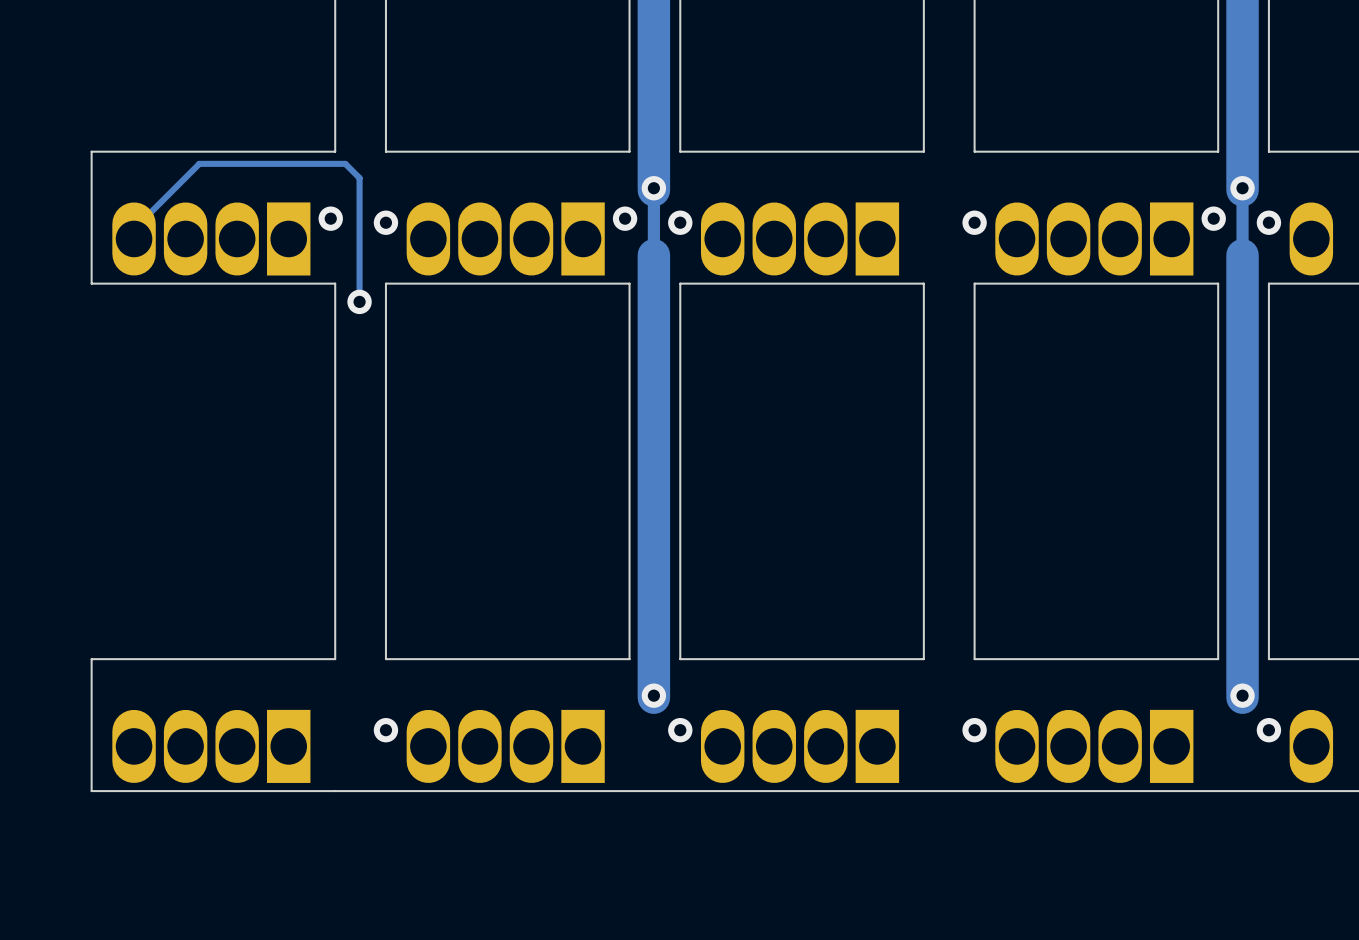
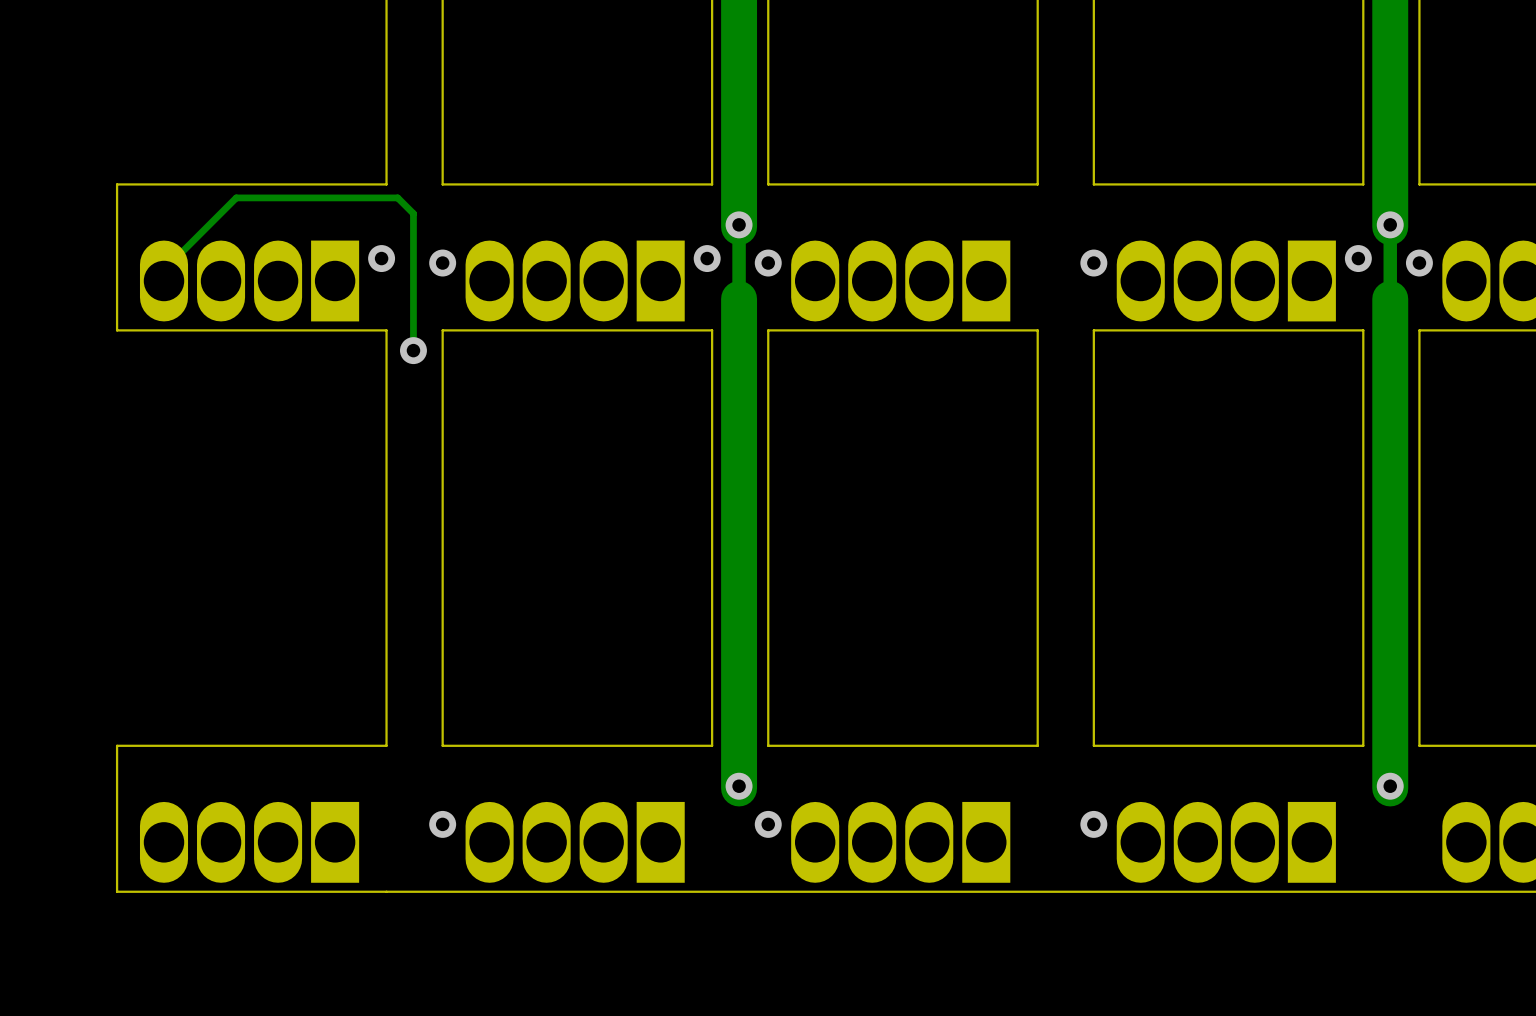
via: (1268, 730) -> none

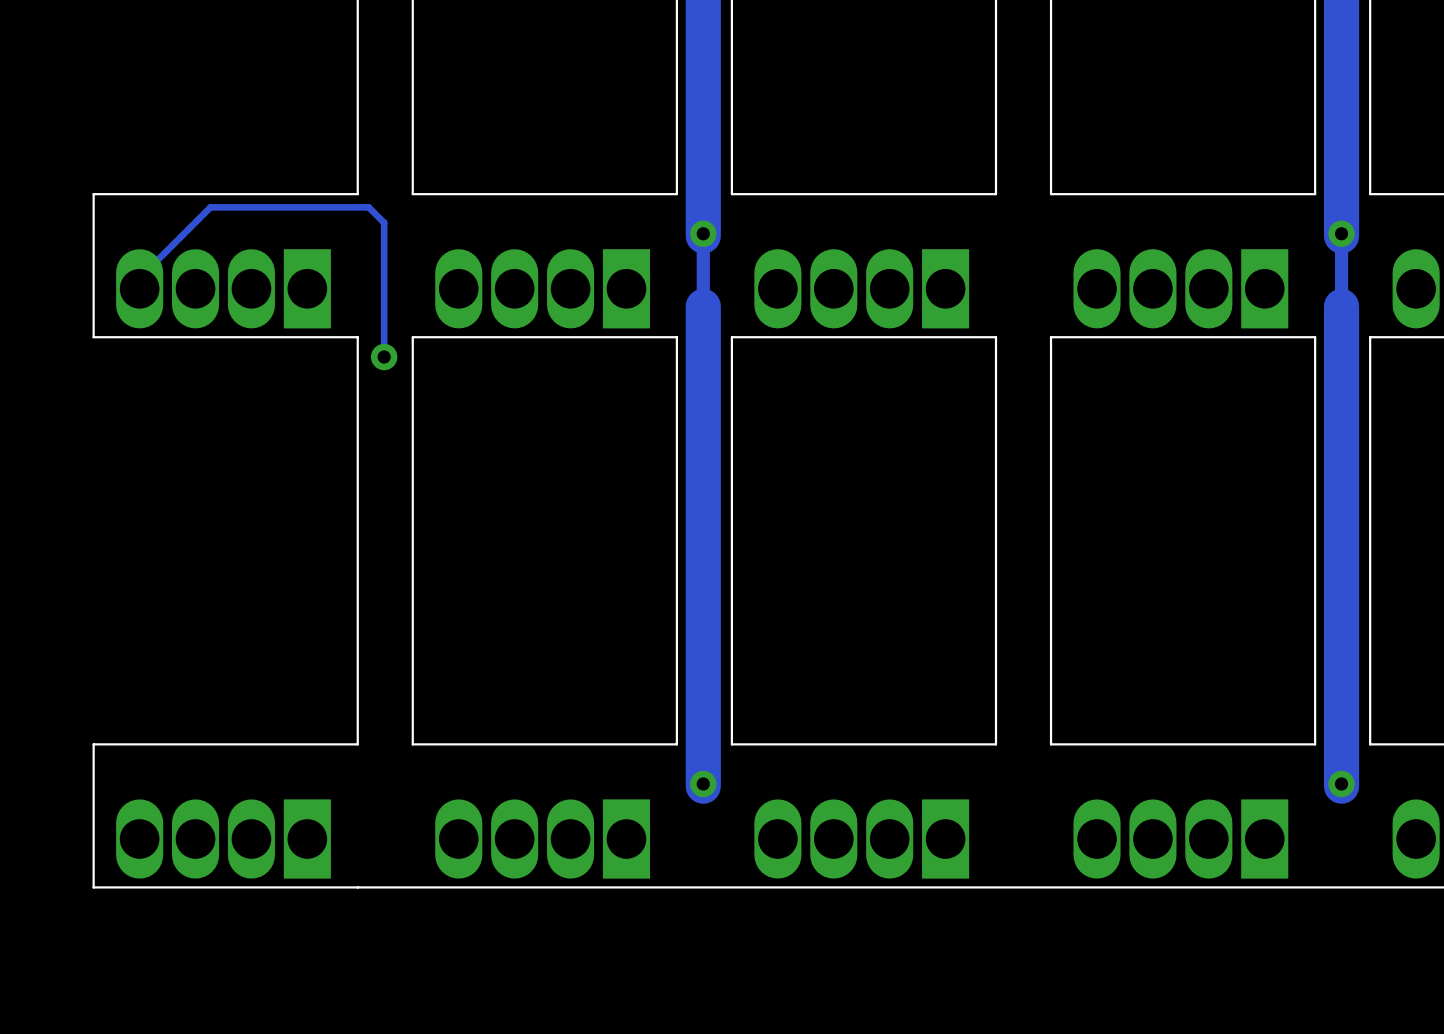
via: (381, 258) -> none
via: (707, 258) -> none
via: (1358, 258) -> none
via: (442, 263) -> none
via: (768, 263) -> none
via: (1093, 263) -> none
via: (1419, 263) -> none
via: (442, 824) -> none
via: (768, 824) -> none
via: (1093, 824) -> none

